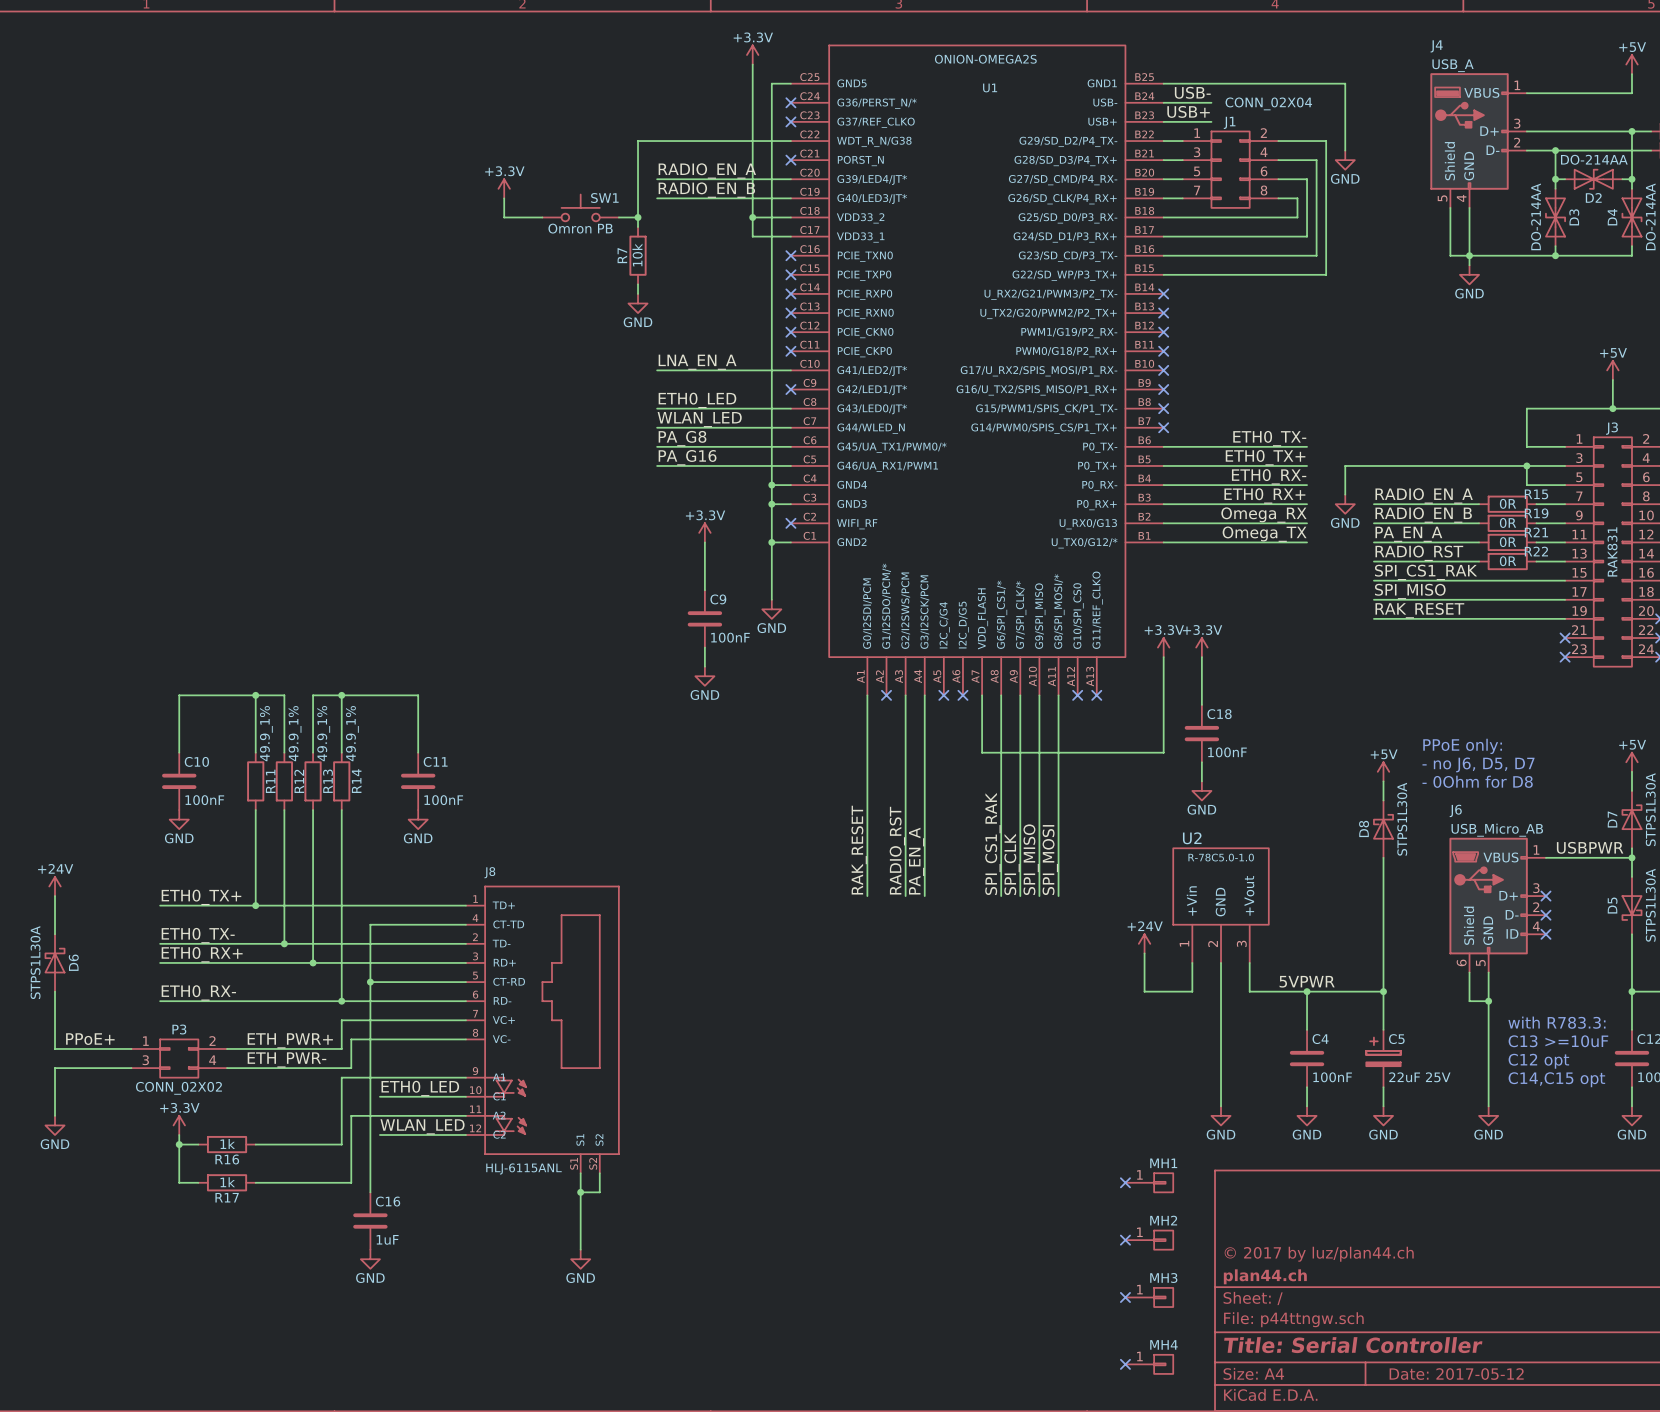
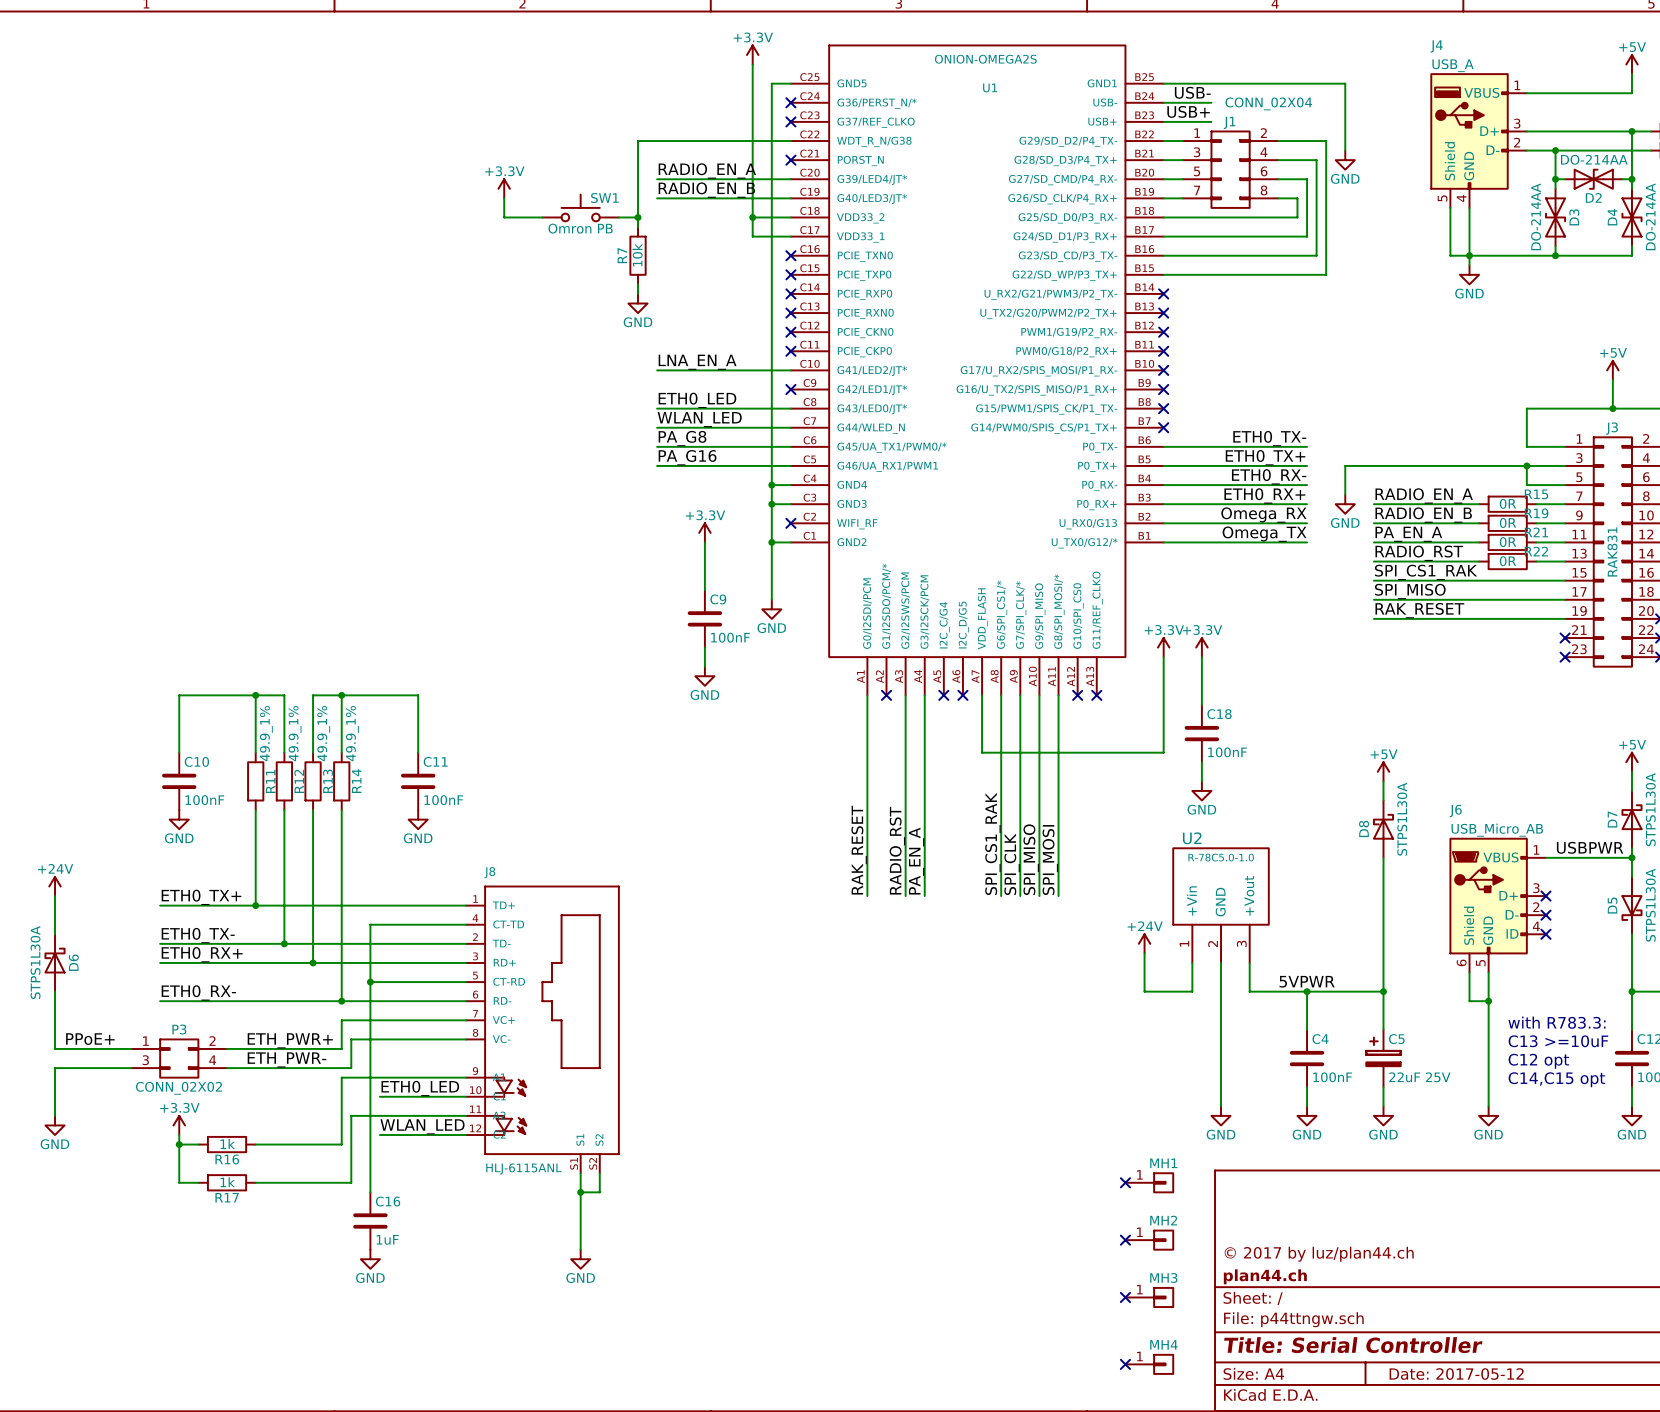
text: PPoE only: (1462, 746) -> none
text: - no J6, D5, D7 (1478, 764) -> none
text: - 0Ohm for D8 (1477, 781) -> none

